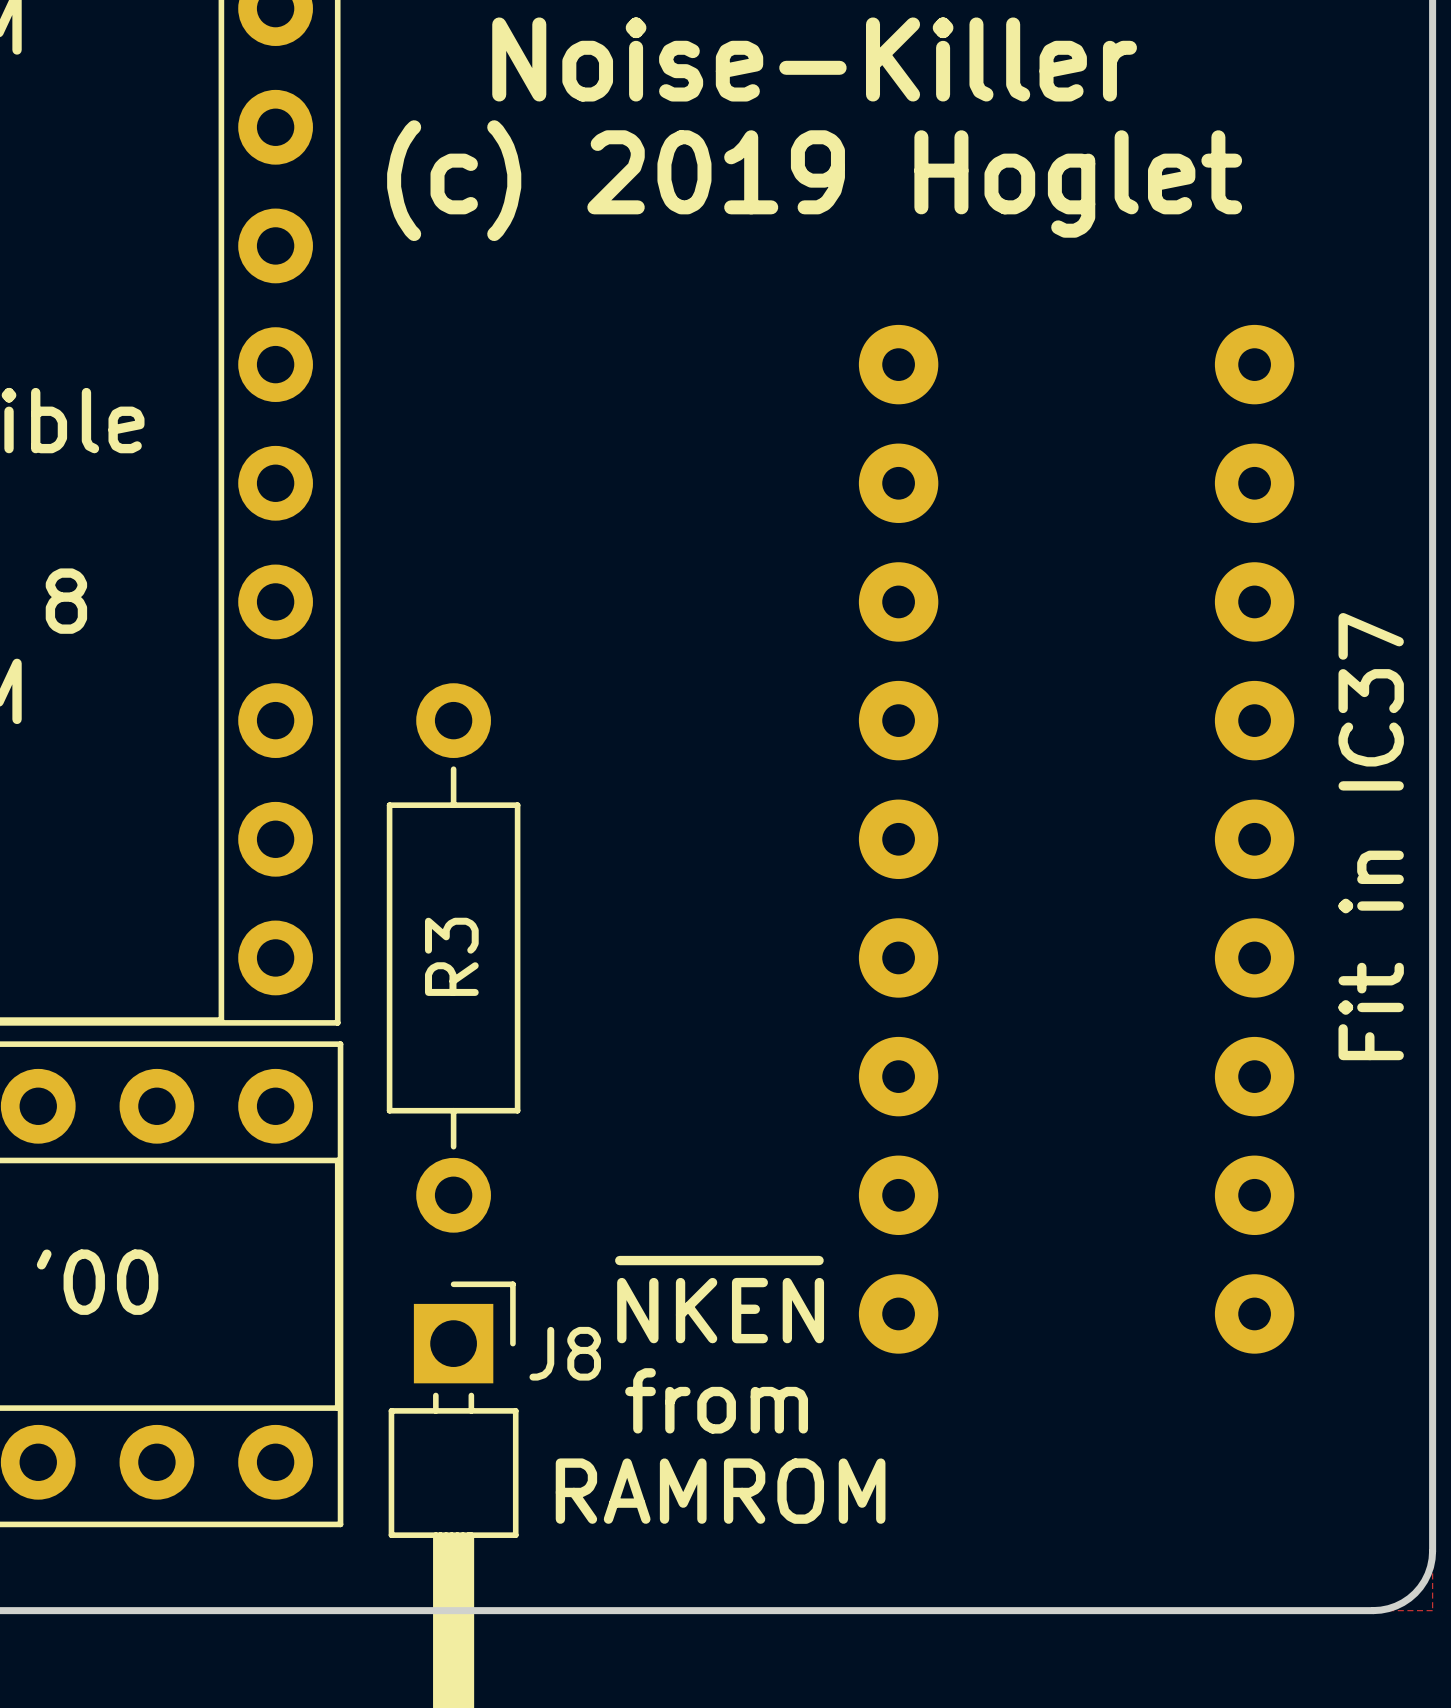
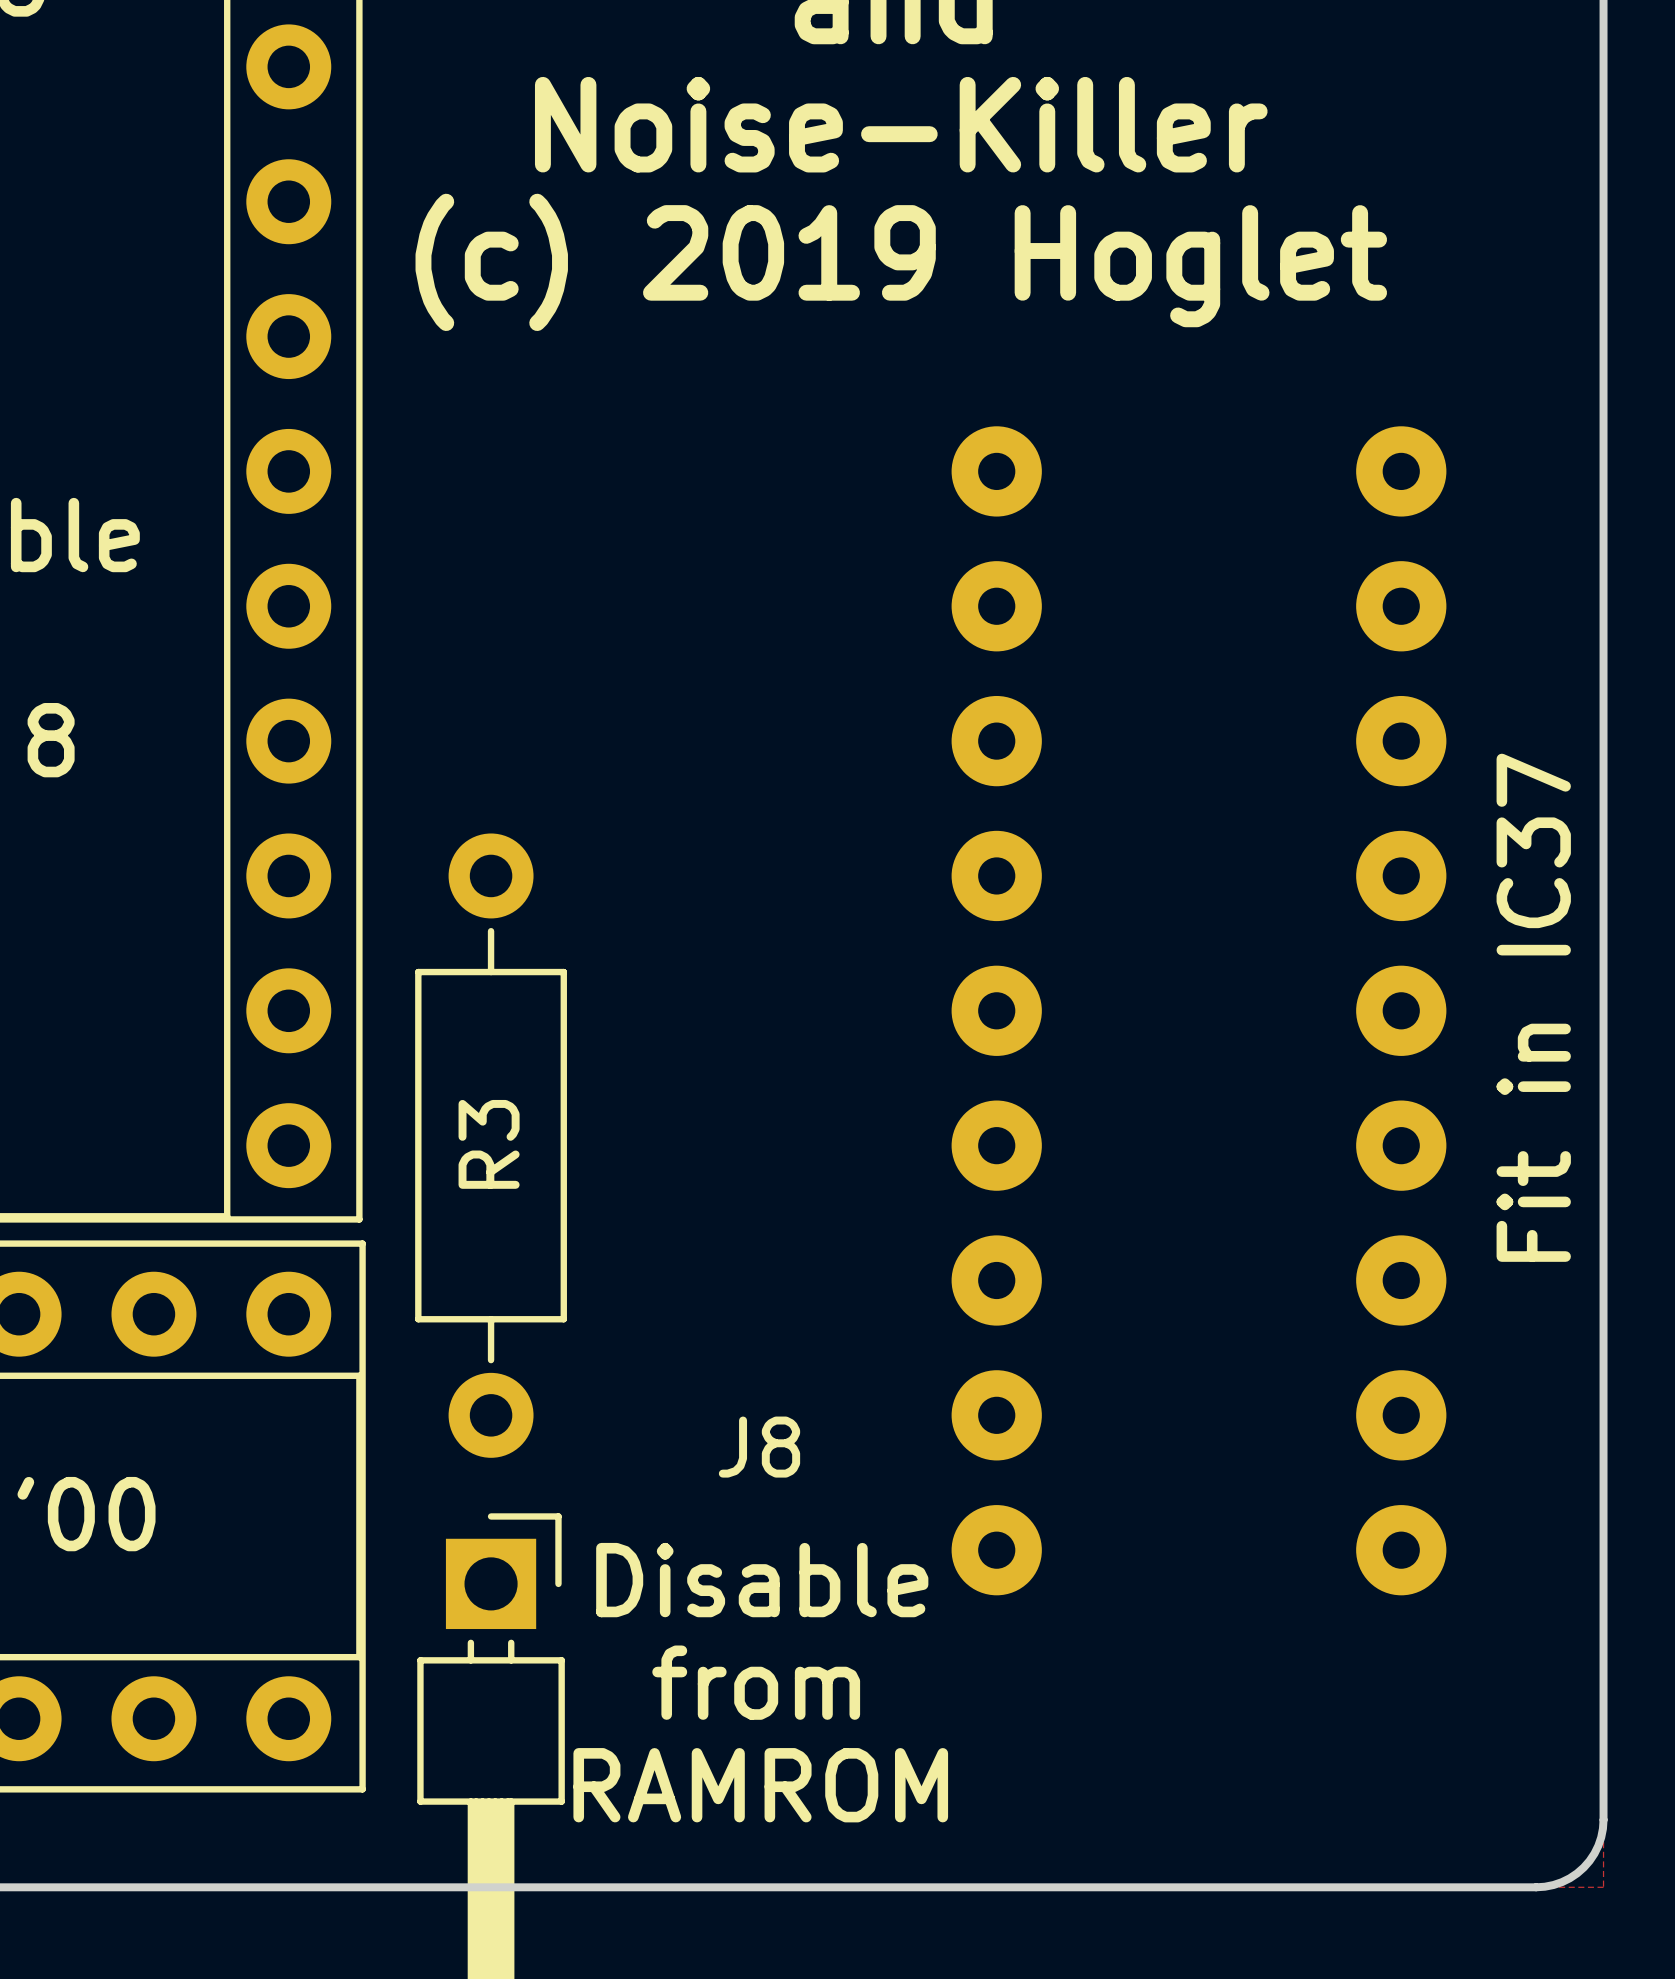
line: (619, 1260) (819, 1260) -> none
text: NKEN (720, 1310) -> Disable (762, 1580)
J8 name position: J8 (565, 1353) -> J8 (759, 1447)
text position: from (716, 1400) -> from (756, 1682)
text position: RAMROM (720, 1491) -> RAMROM (760, 1785)

